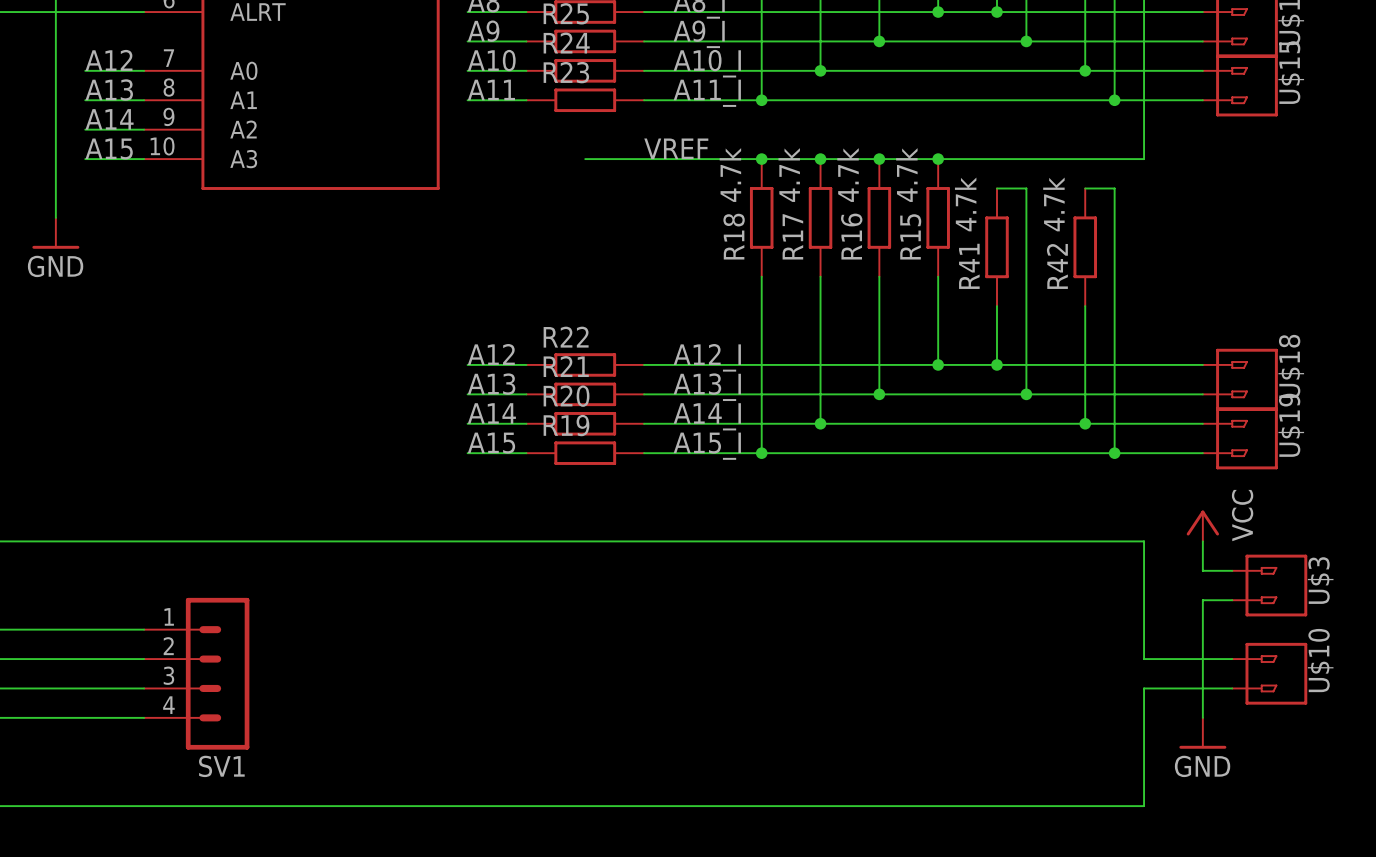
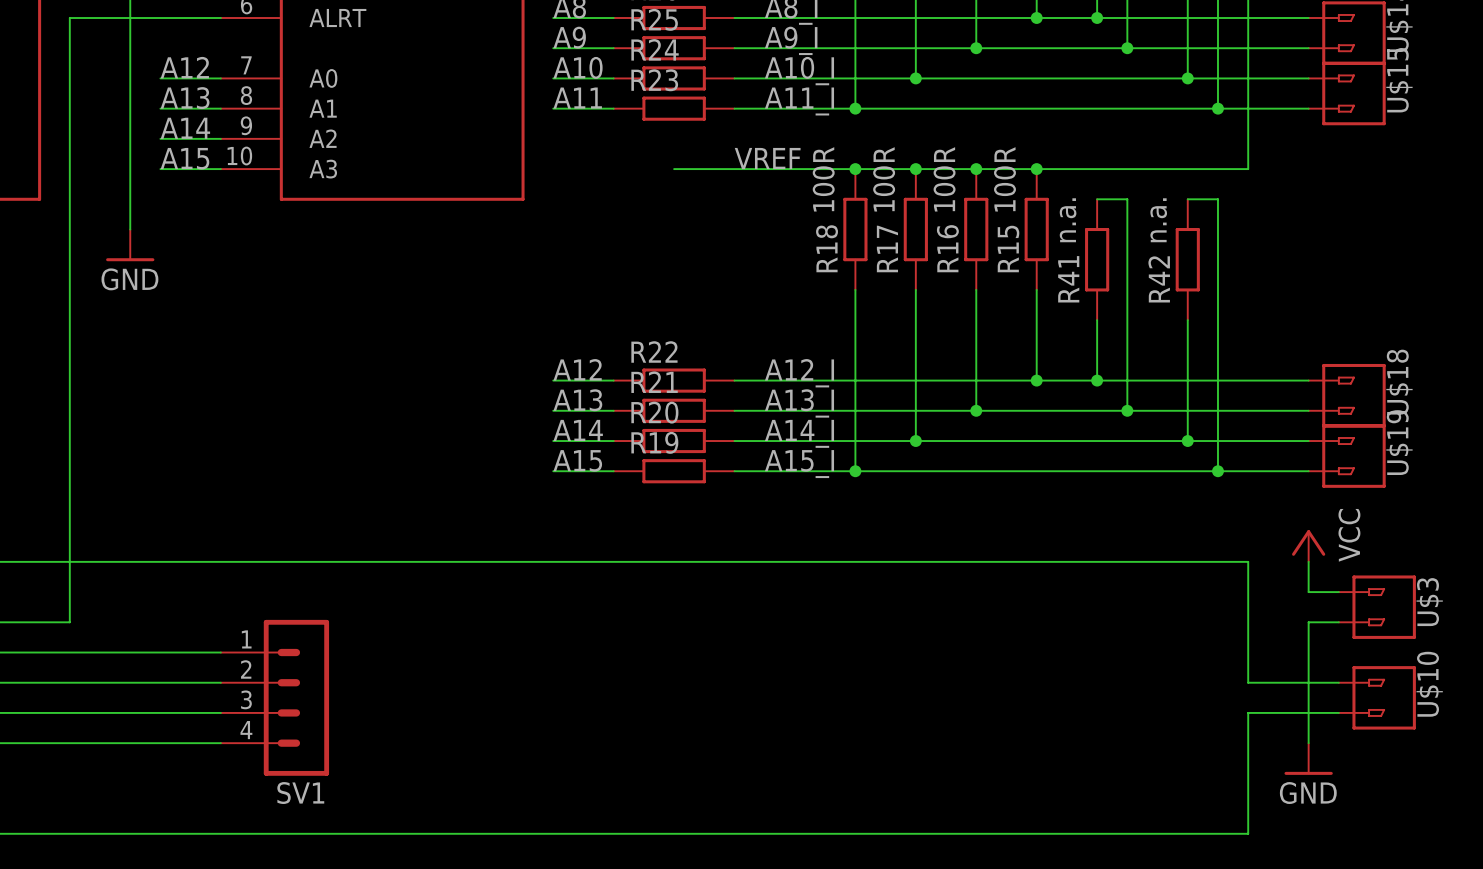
R18 value: 4.7k (730, 175) -> 100R (823, 179)
R17 value: 4.7k (789, 175) -> 100R (884, 179)
R16 value: 4.7k (848, 175) -> 100R (944, 179)
R15 value: 4.7k (906, 175) -> 100R (1004, 179)
R41 value: 4.7k (965, 204) -> n.a. (1068, 220)
R42 value: 4.7k (1053, 204) -> n.a. (1158, 220)

